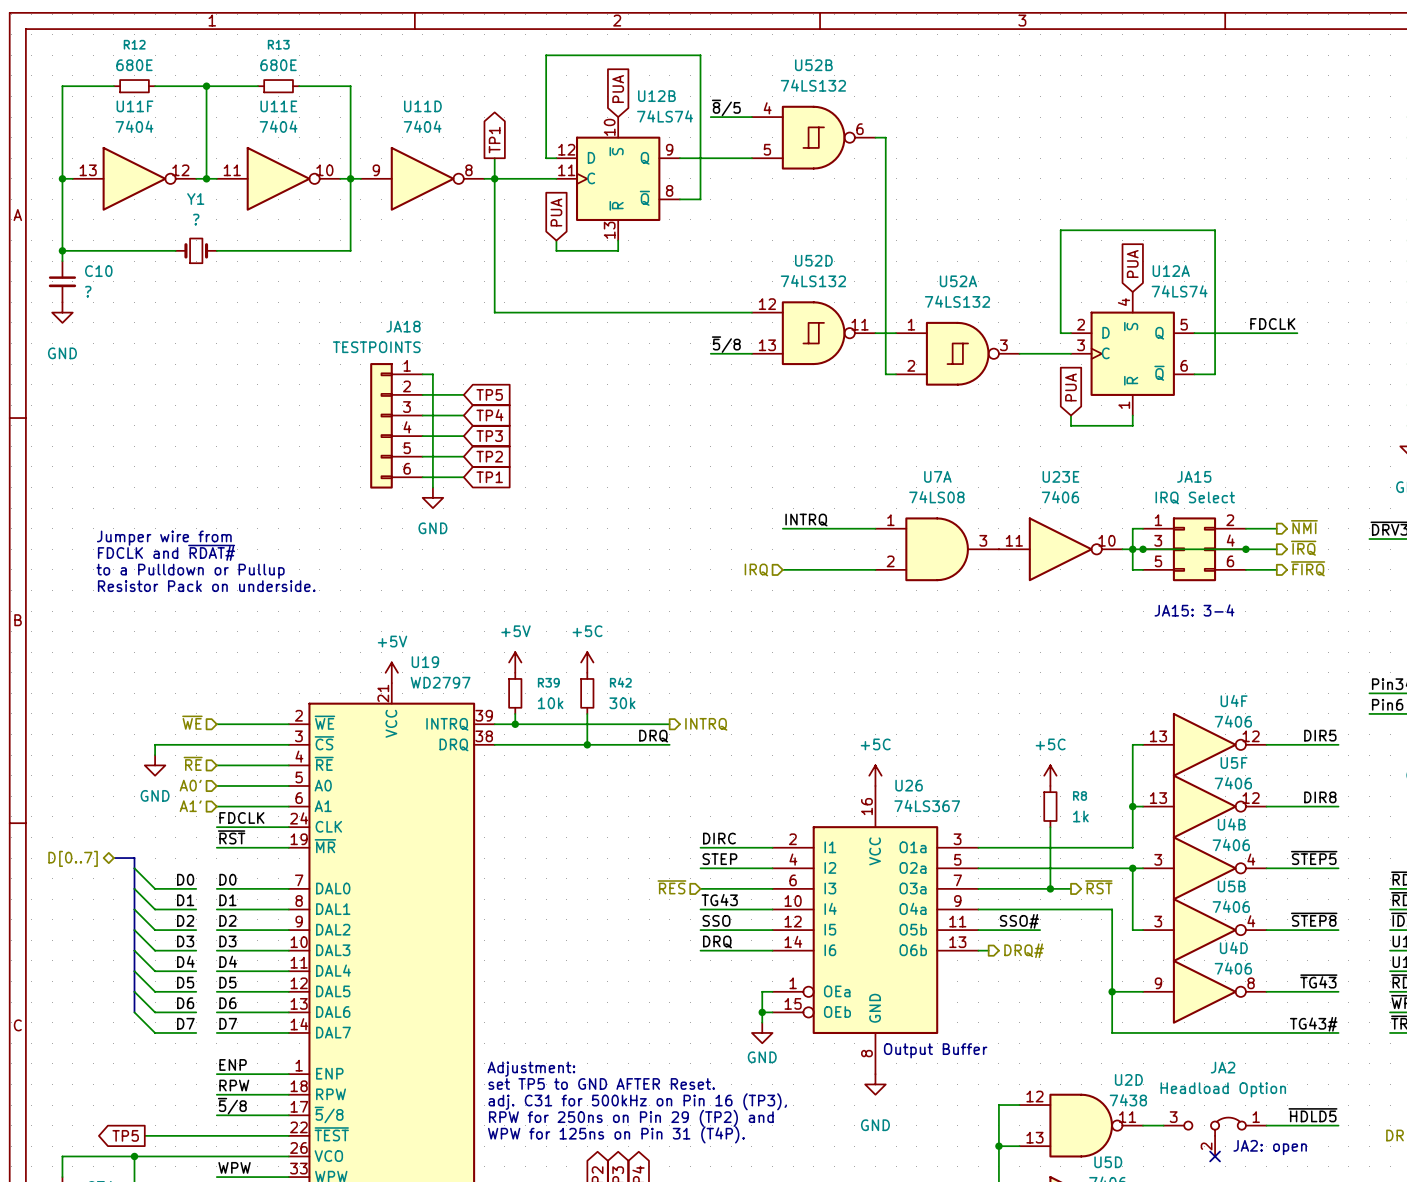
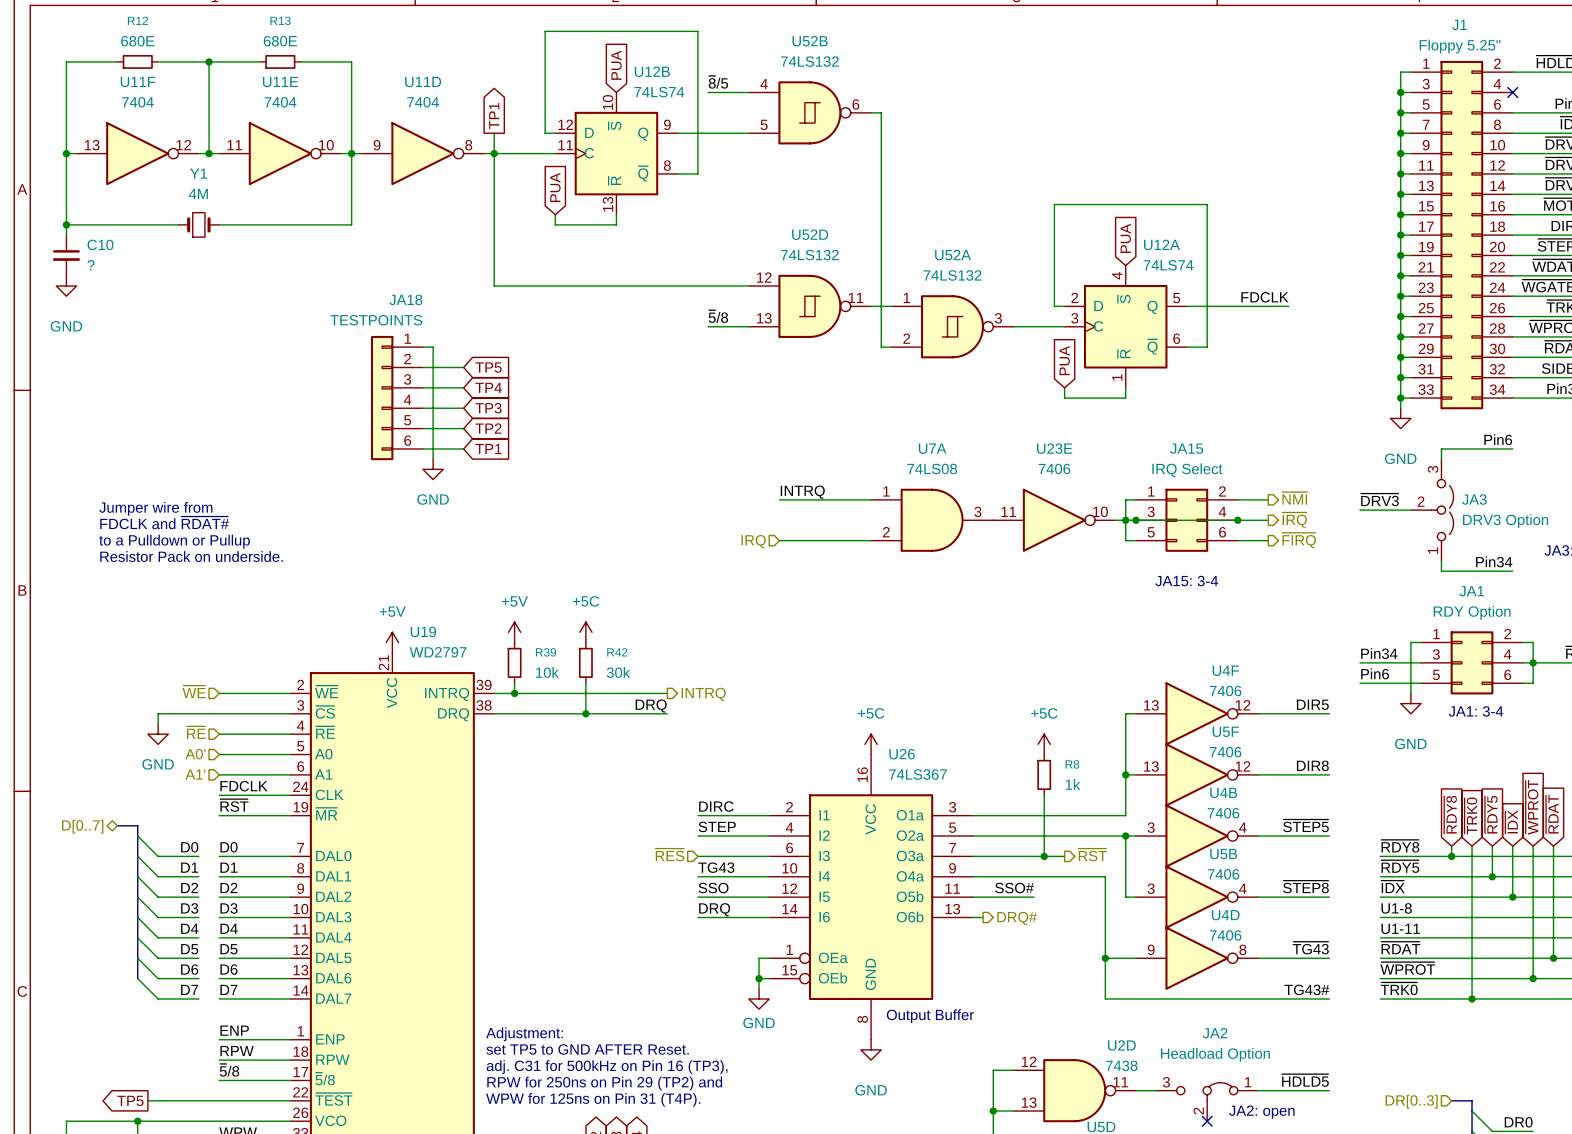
Y1 value: ? (196, 219) -> 4M (198, 193)

